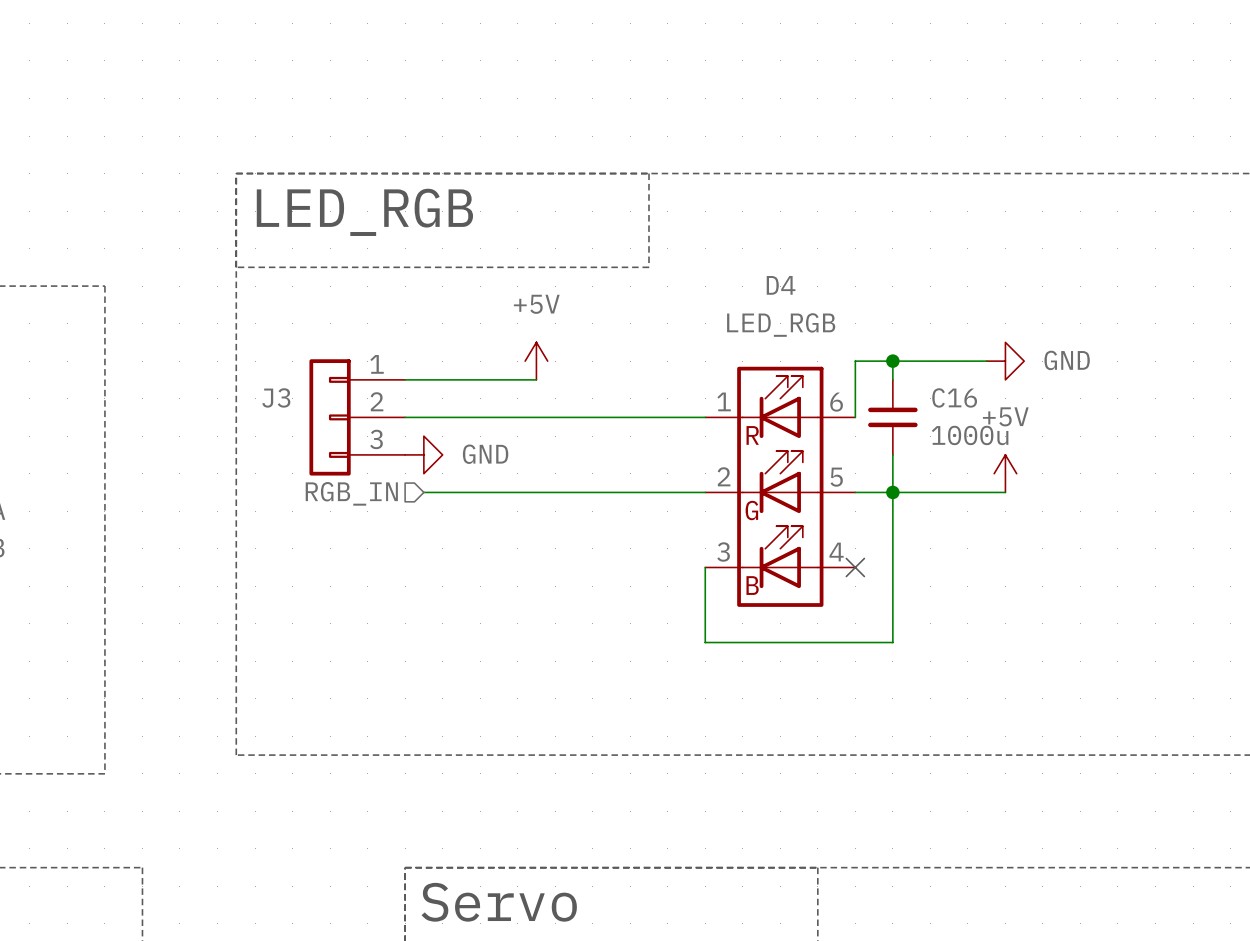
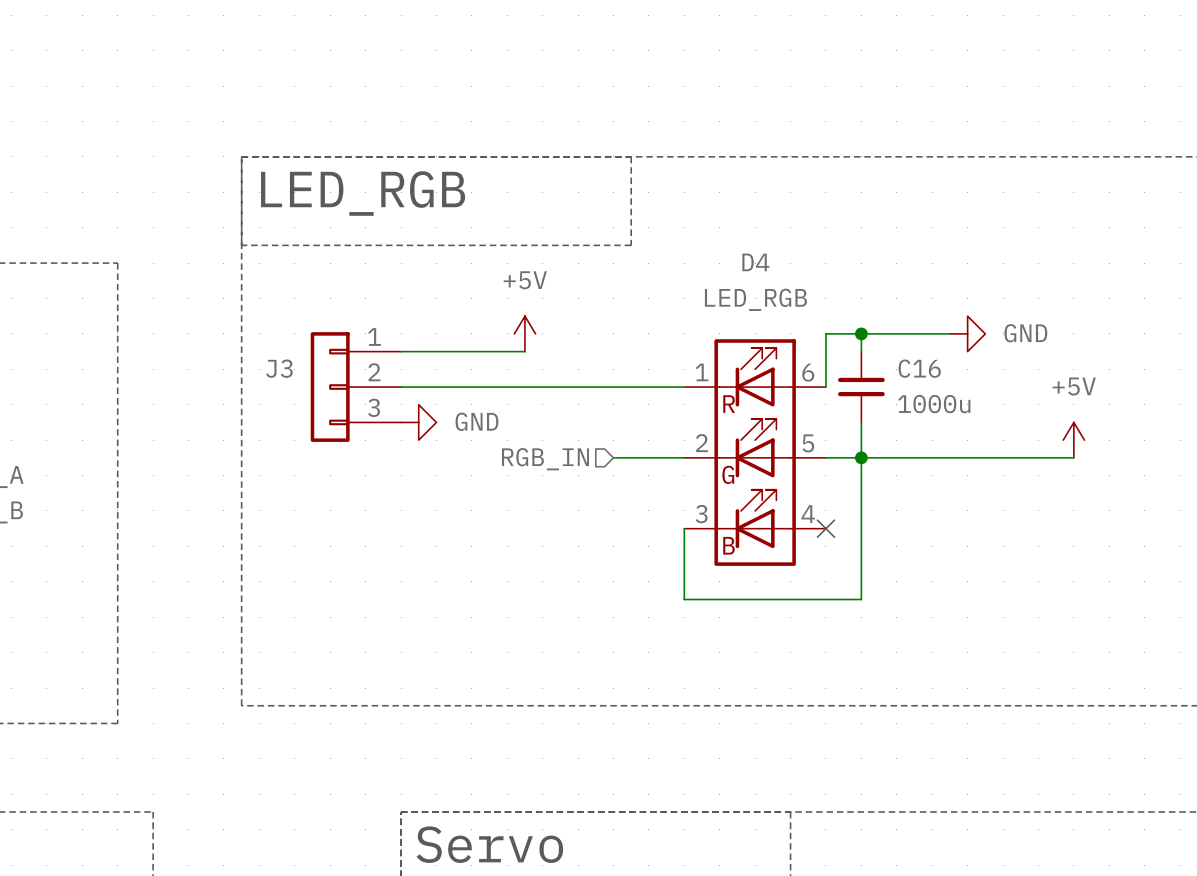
power symbol position: +5V (1005, 473) -> +5V (1073, 440)
wire: (423, 492) (630, 492) -> none
wire: none -> (967, 457) (1073, 457)
hierarchical label position: RGB_IN (351, 493) -> RGB_IN (545, 459)

